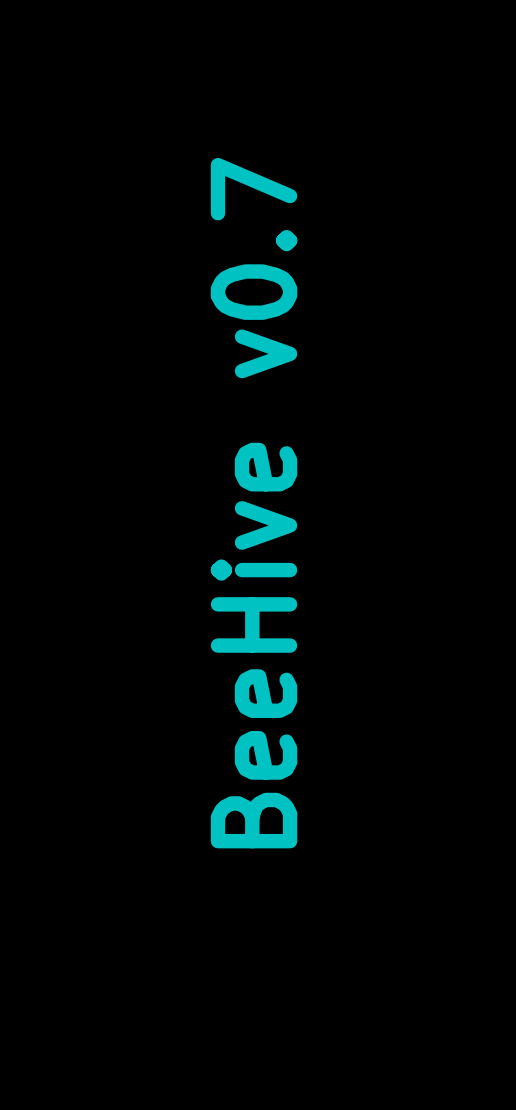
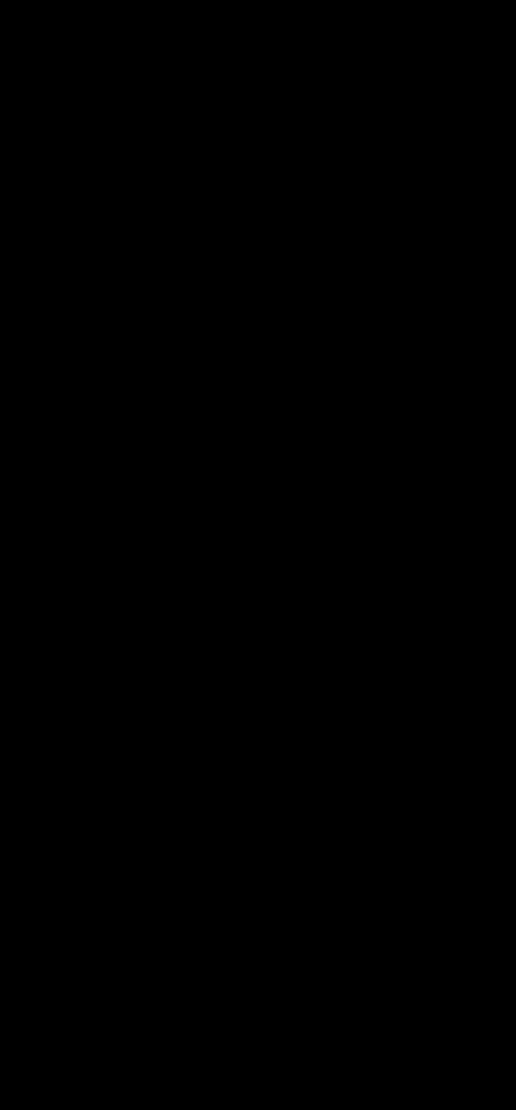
text: BeeHive v0.7 (254, 503) -> none

